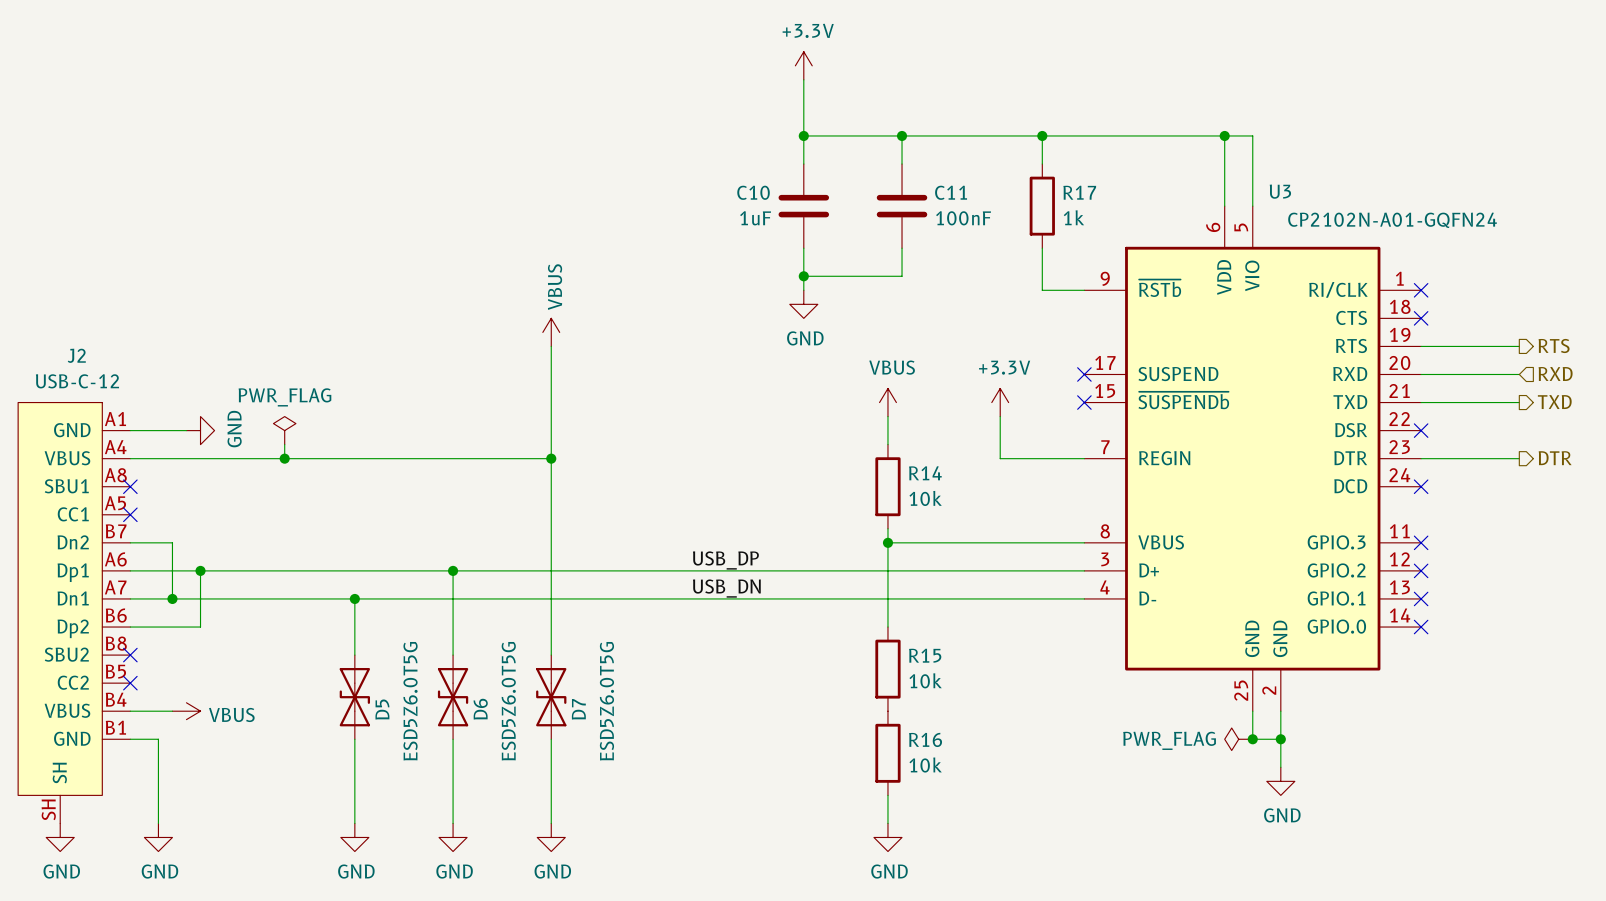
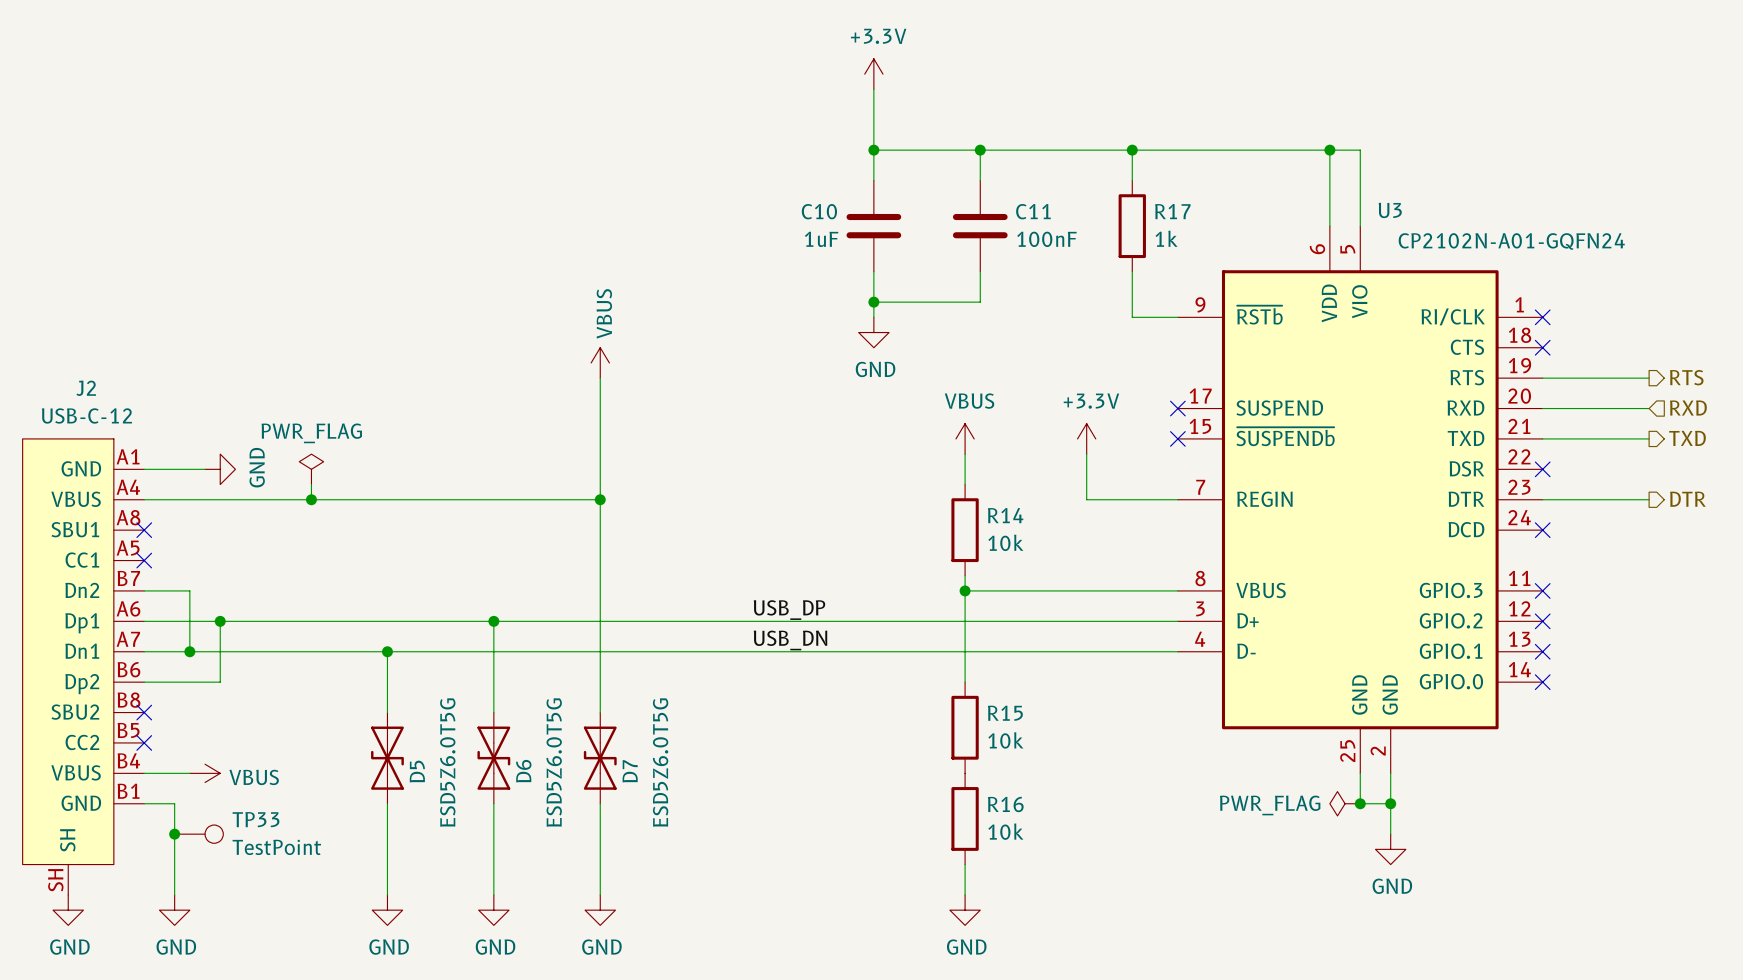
junction: none -> (174, 834)
TP33: none -> TestPoint (198, 834)

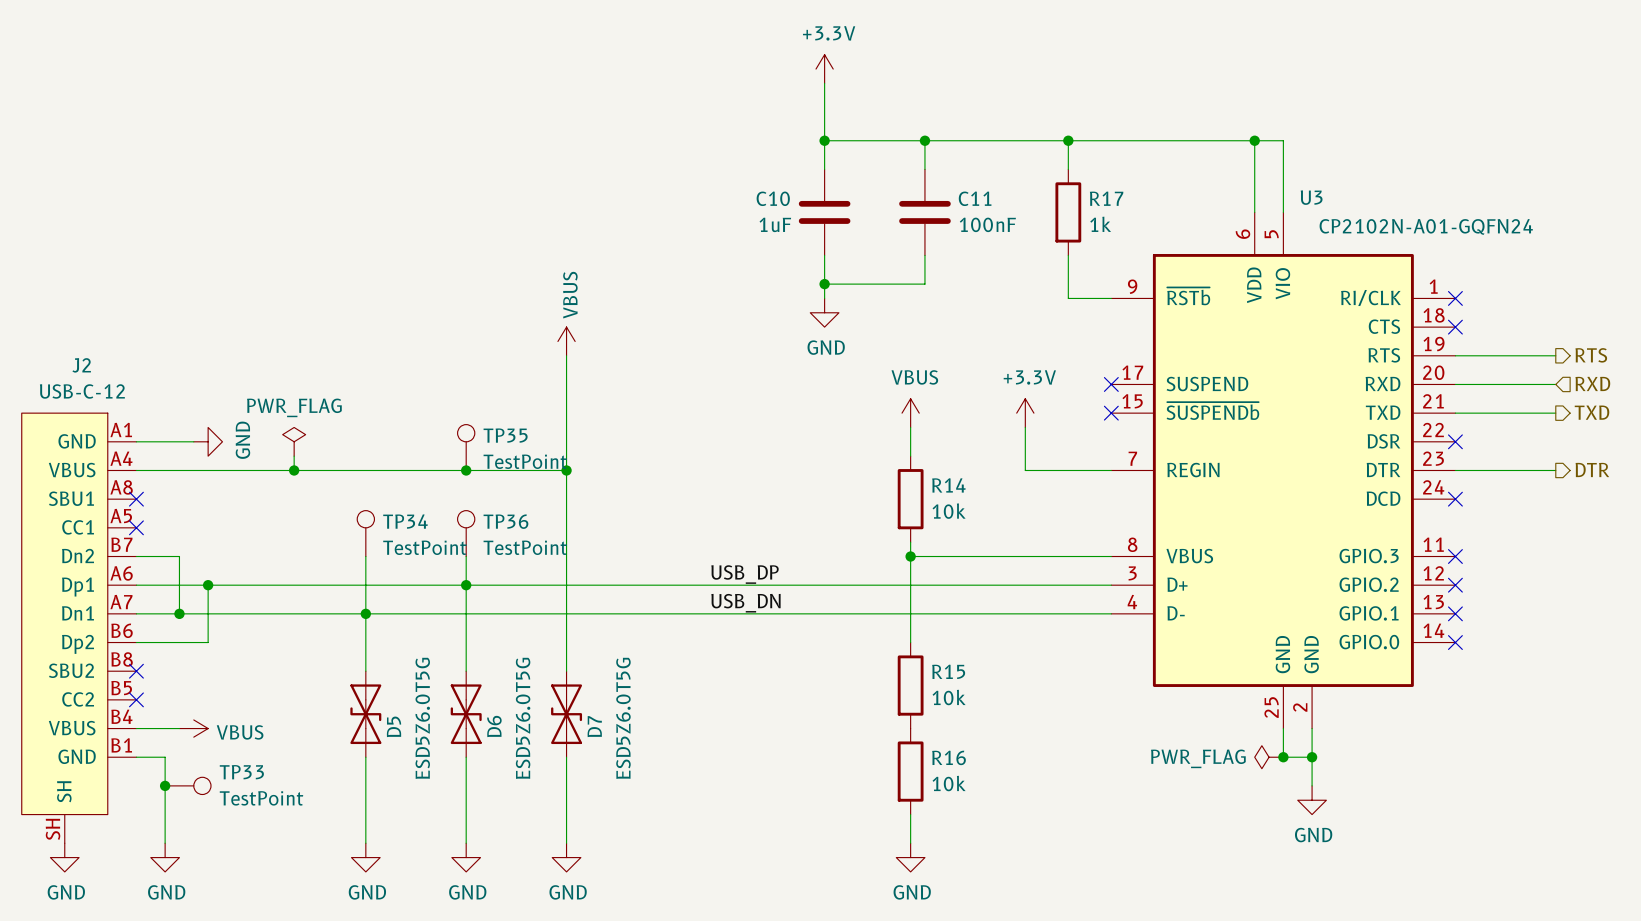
TP35: none -> TestPoint (466, 447)
junction: none -> (466, 470)
TP34: none -> TestPoint (365, 533)
TP36: none -> TestPoint (466, 533)
wire: none -> (365, 556) (365, 613)
wire: none -> (466, 556) (466, 585)

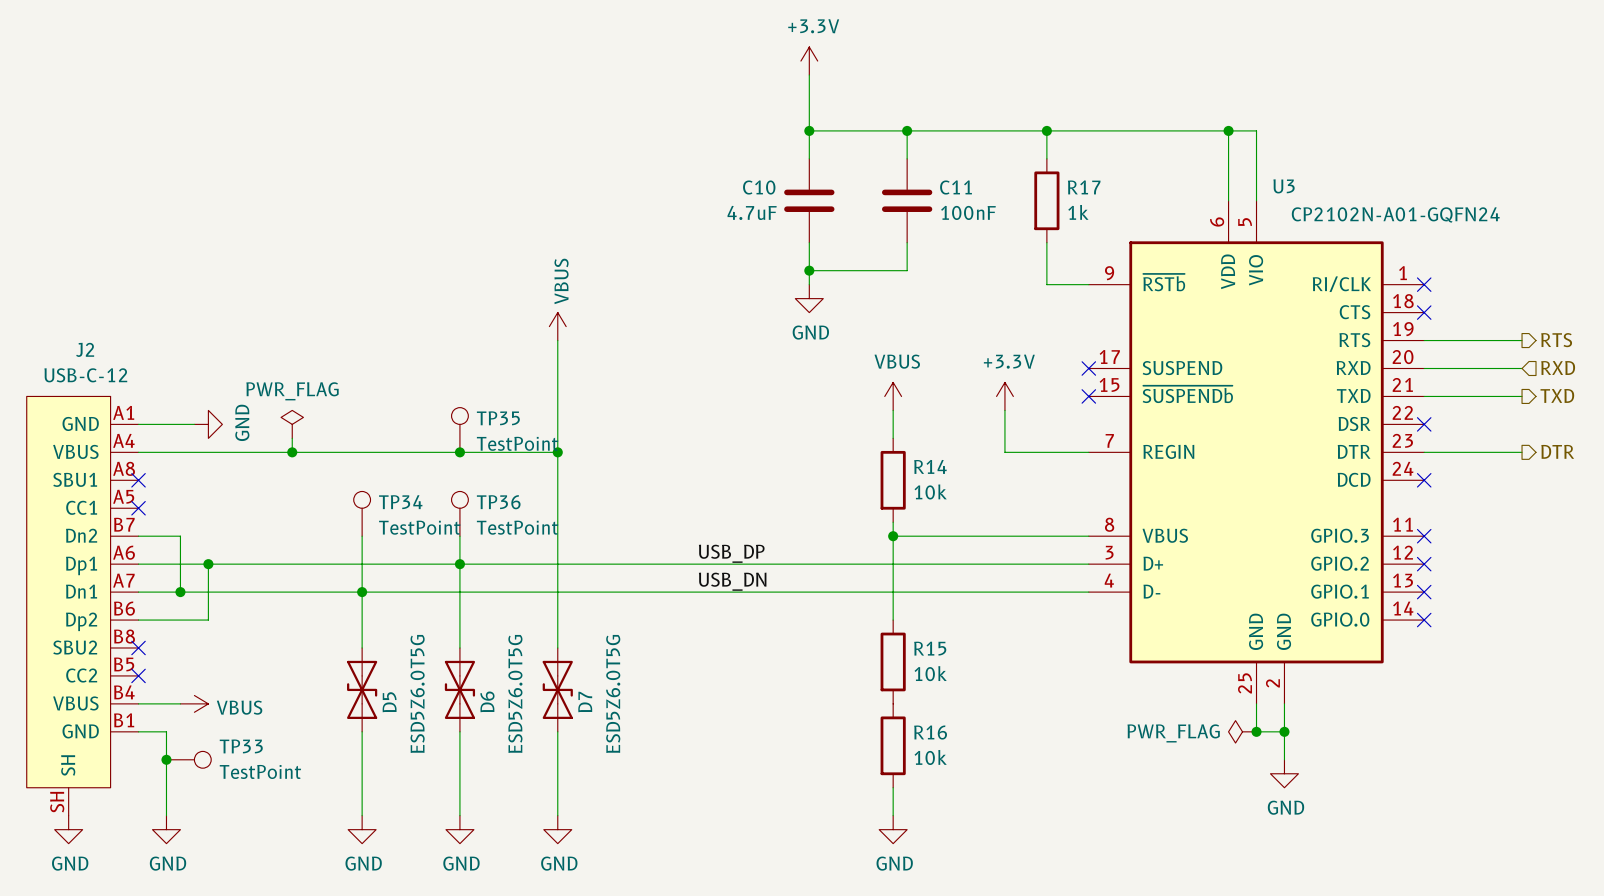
C10 value: 1uF (775, 224) -> 4.7uF (752, 212)

